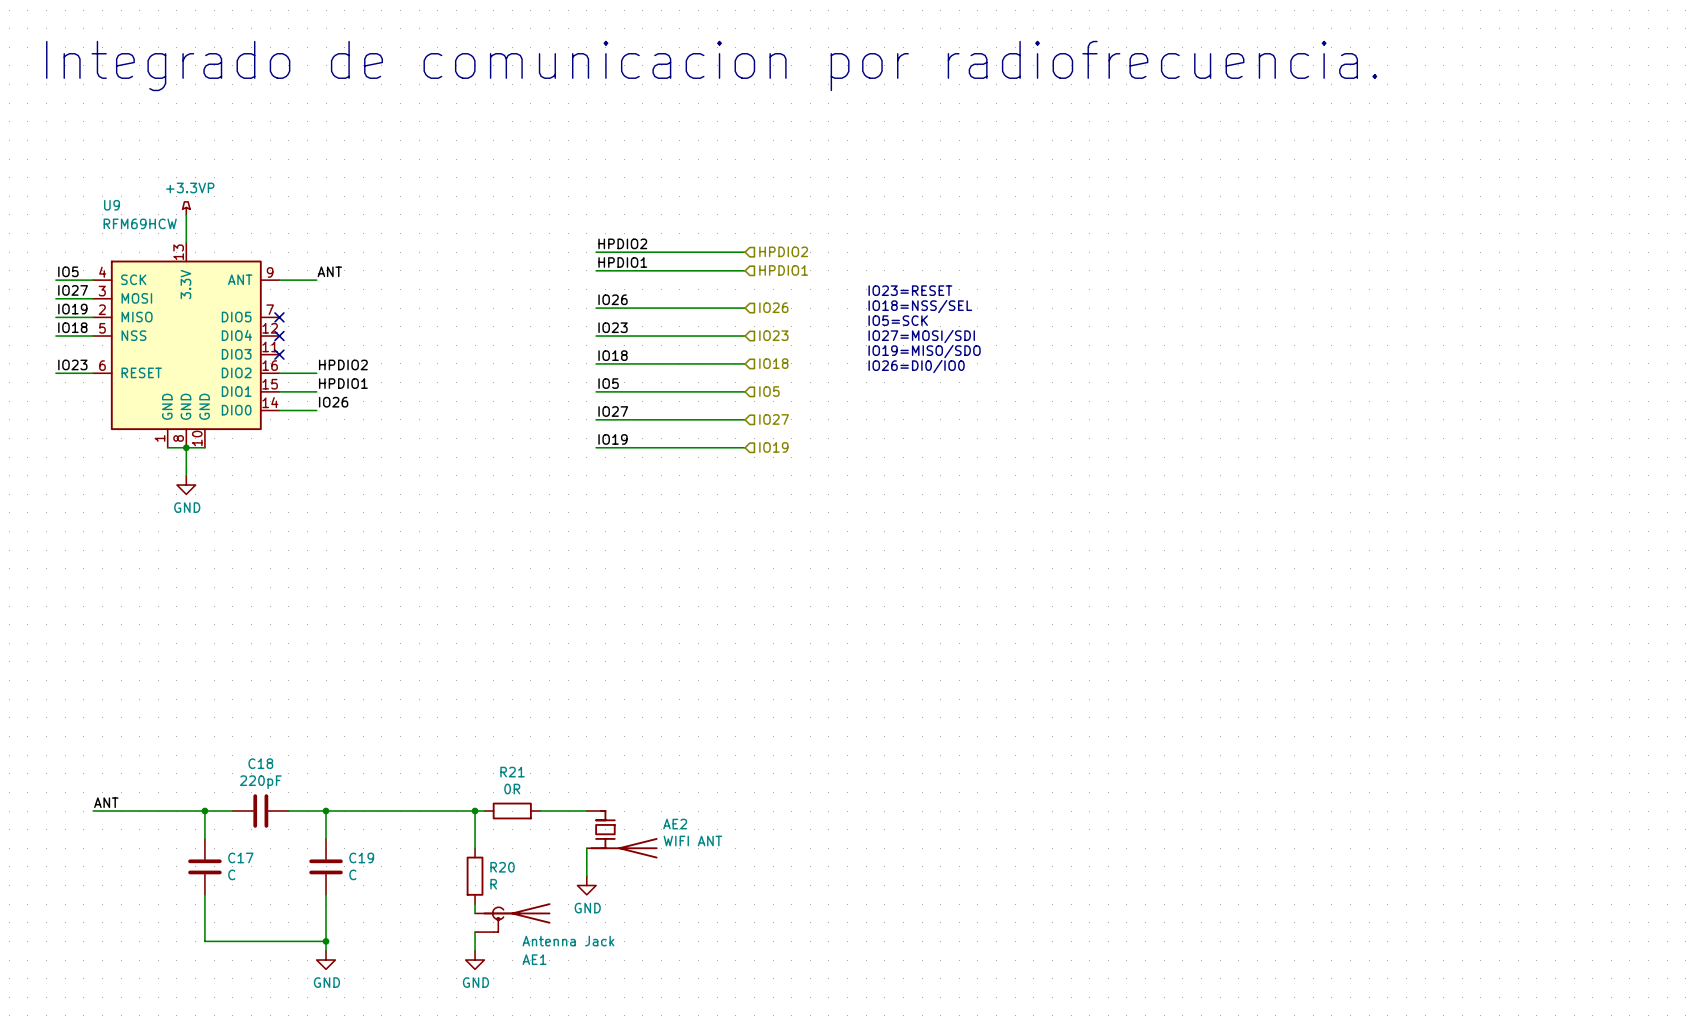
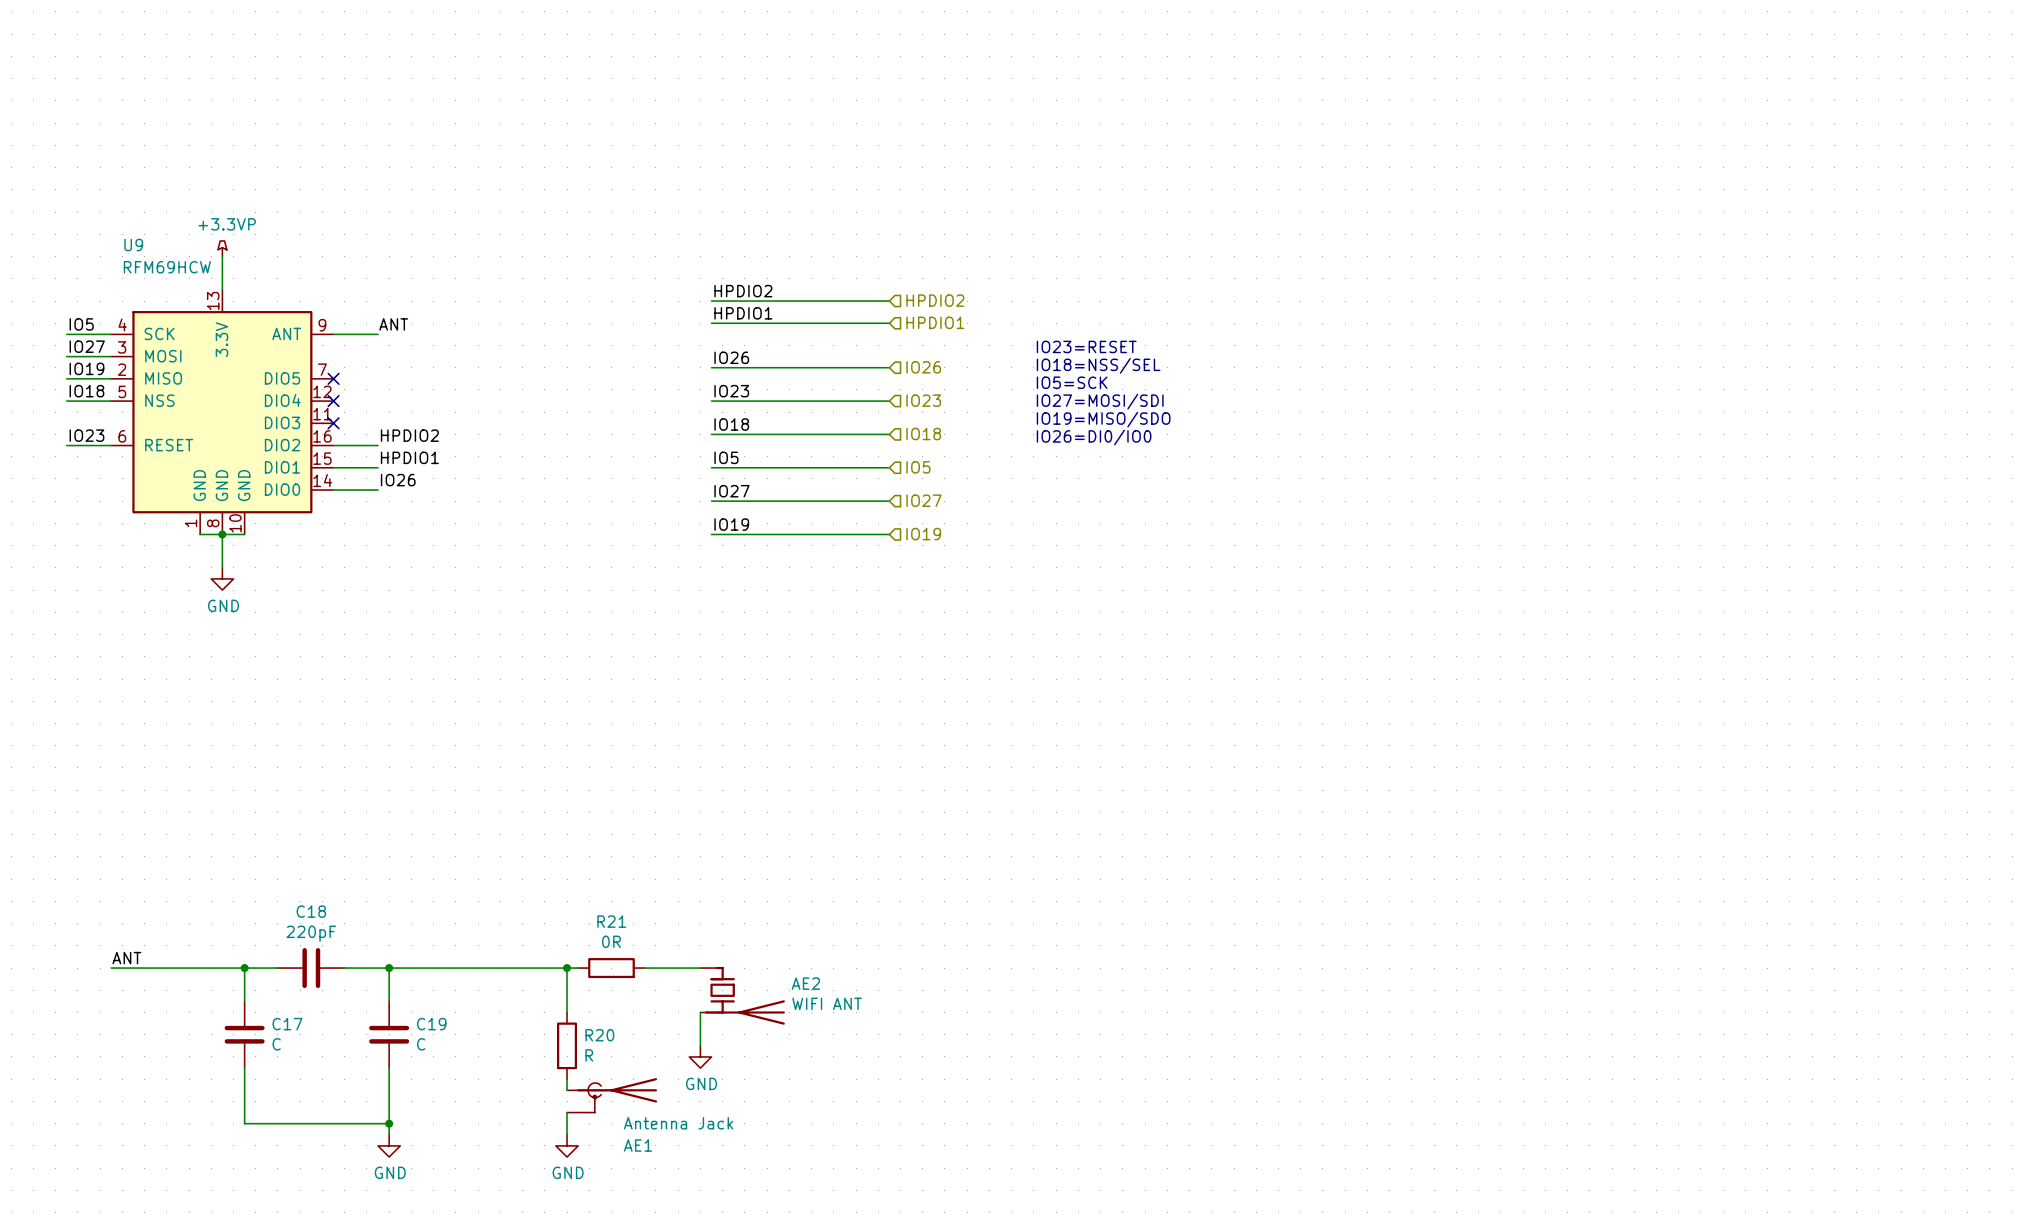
text: Integrado de comunicacion por radiofrecuencia. (711, 65) -> none

